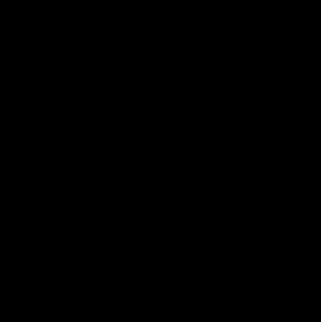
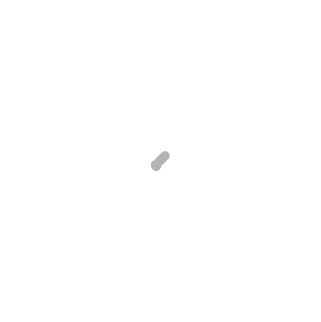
track: none -> (165, 155) (156, 166)

